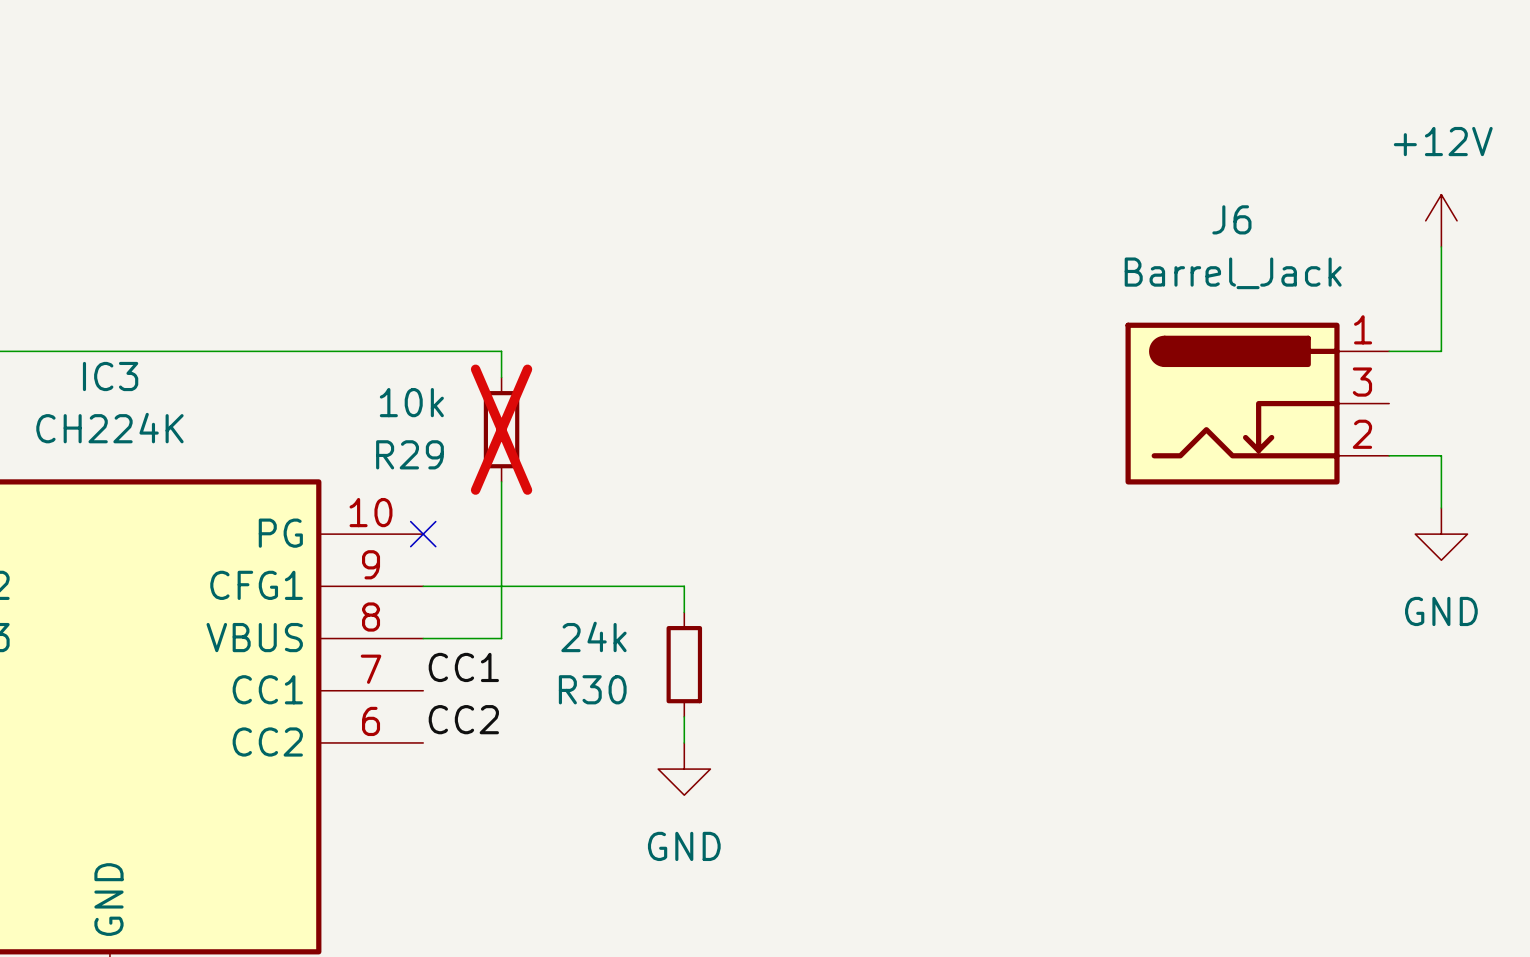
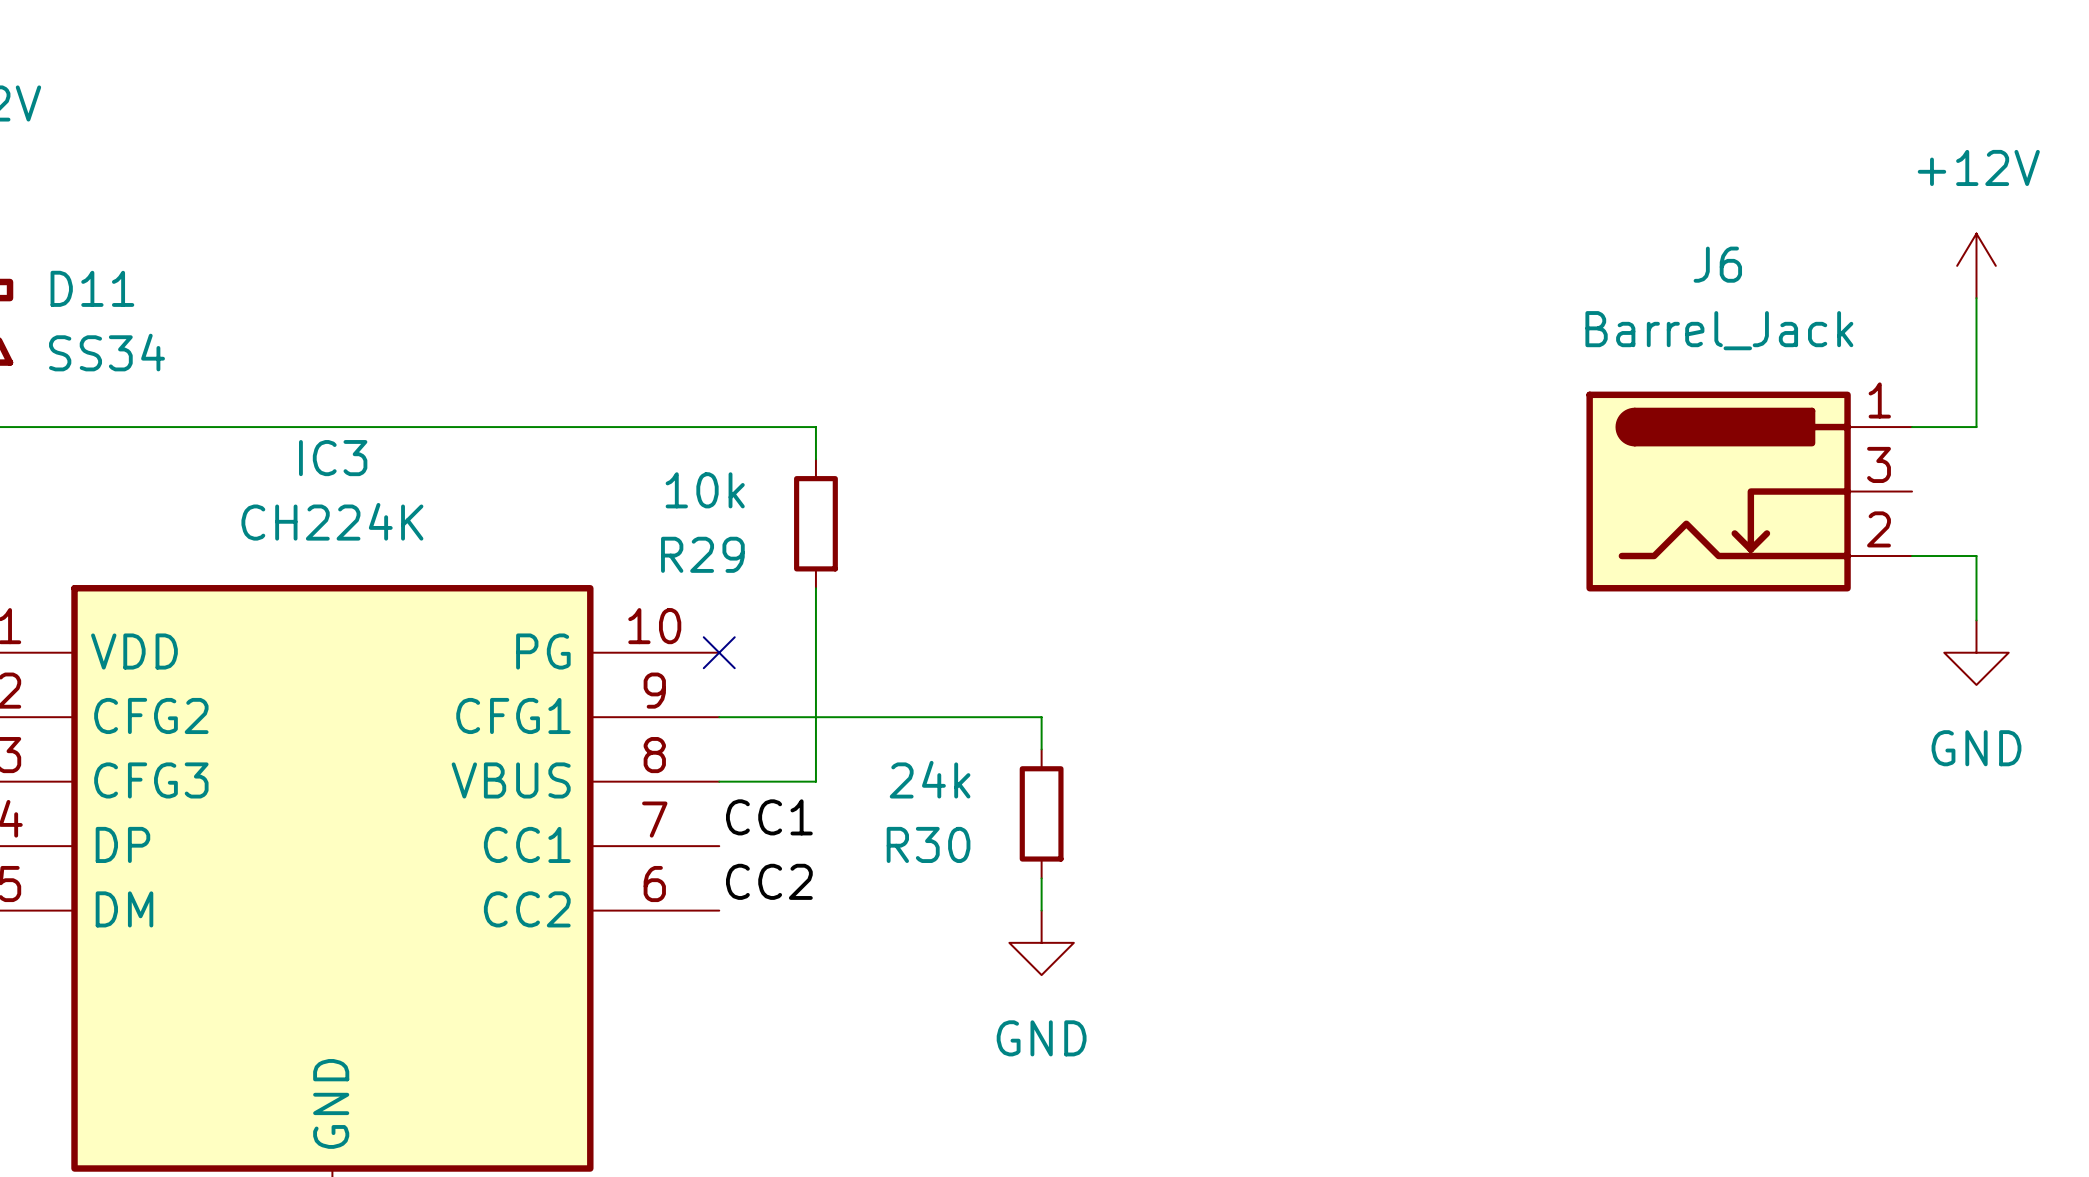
R29 do-not-place cross: (501, 429) -> none

